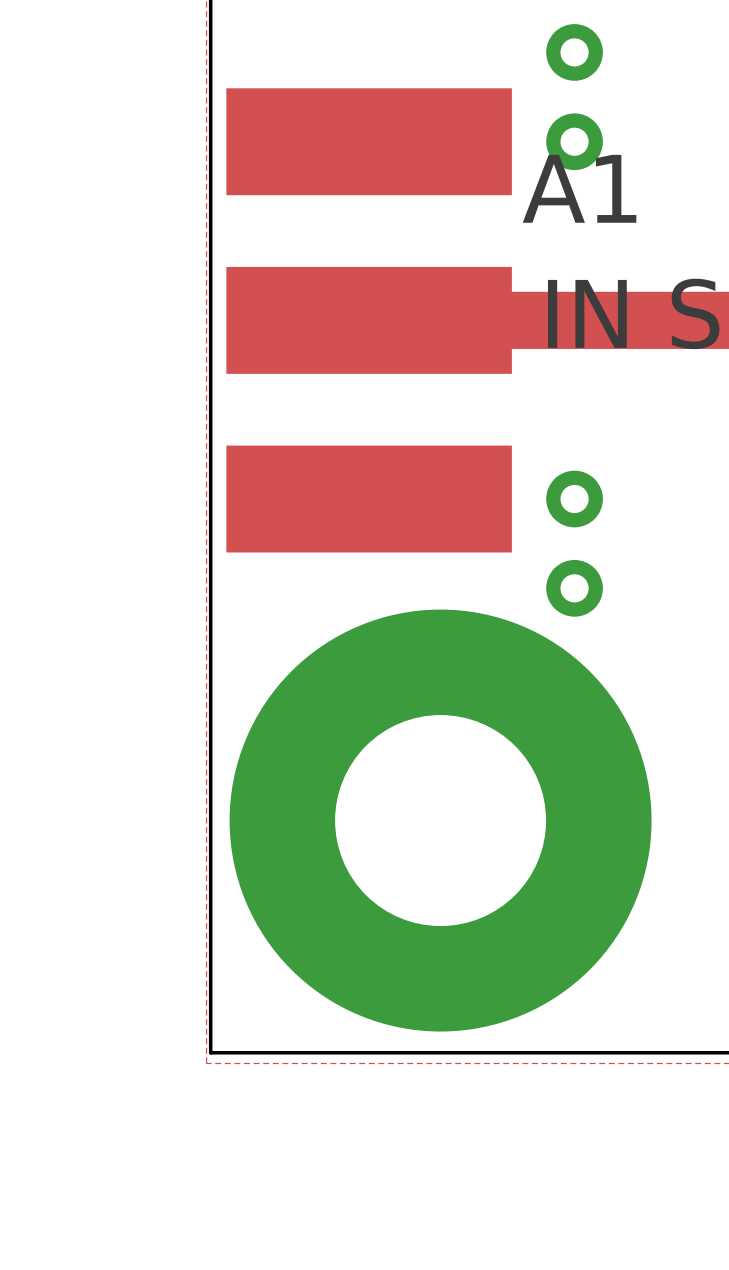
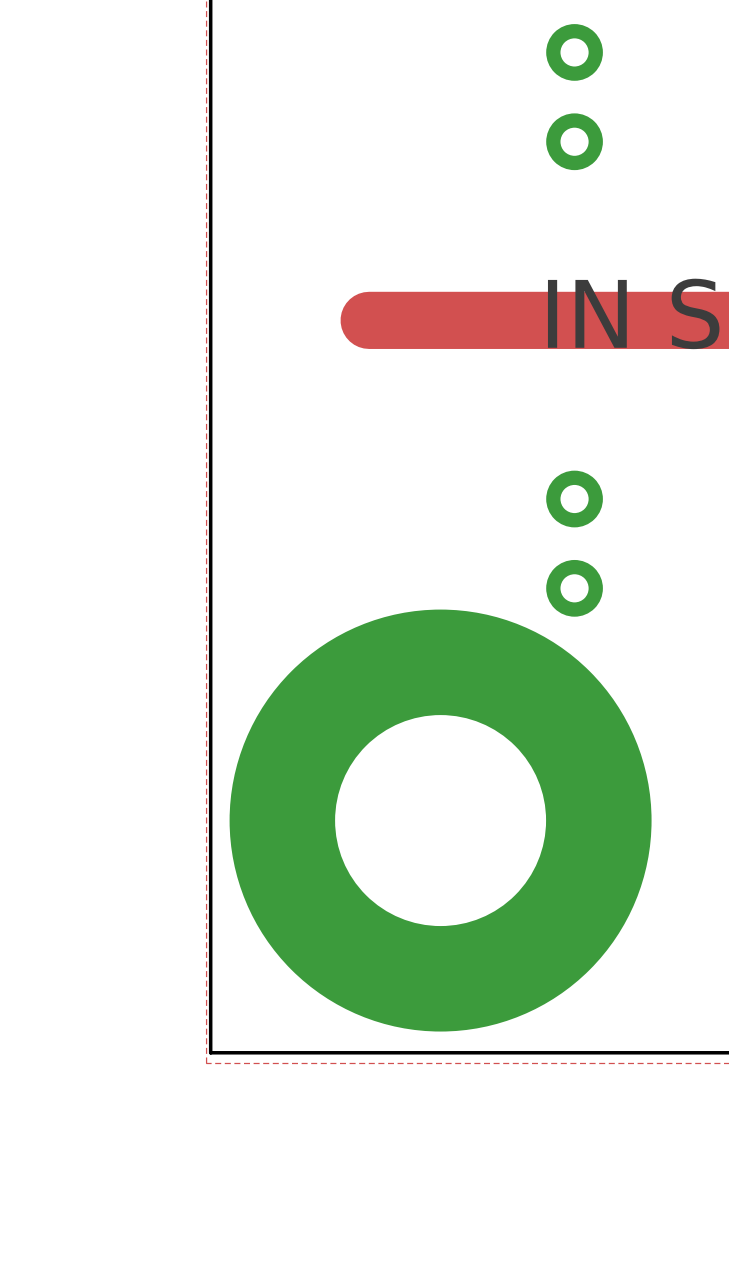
A1: (369, 320) -> none

